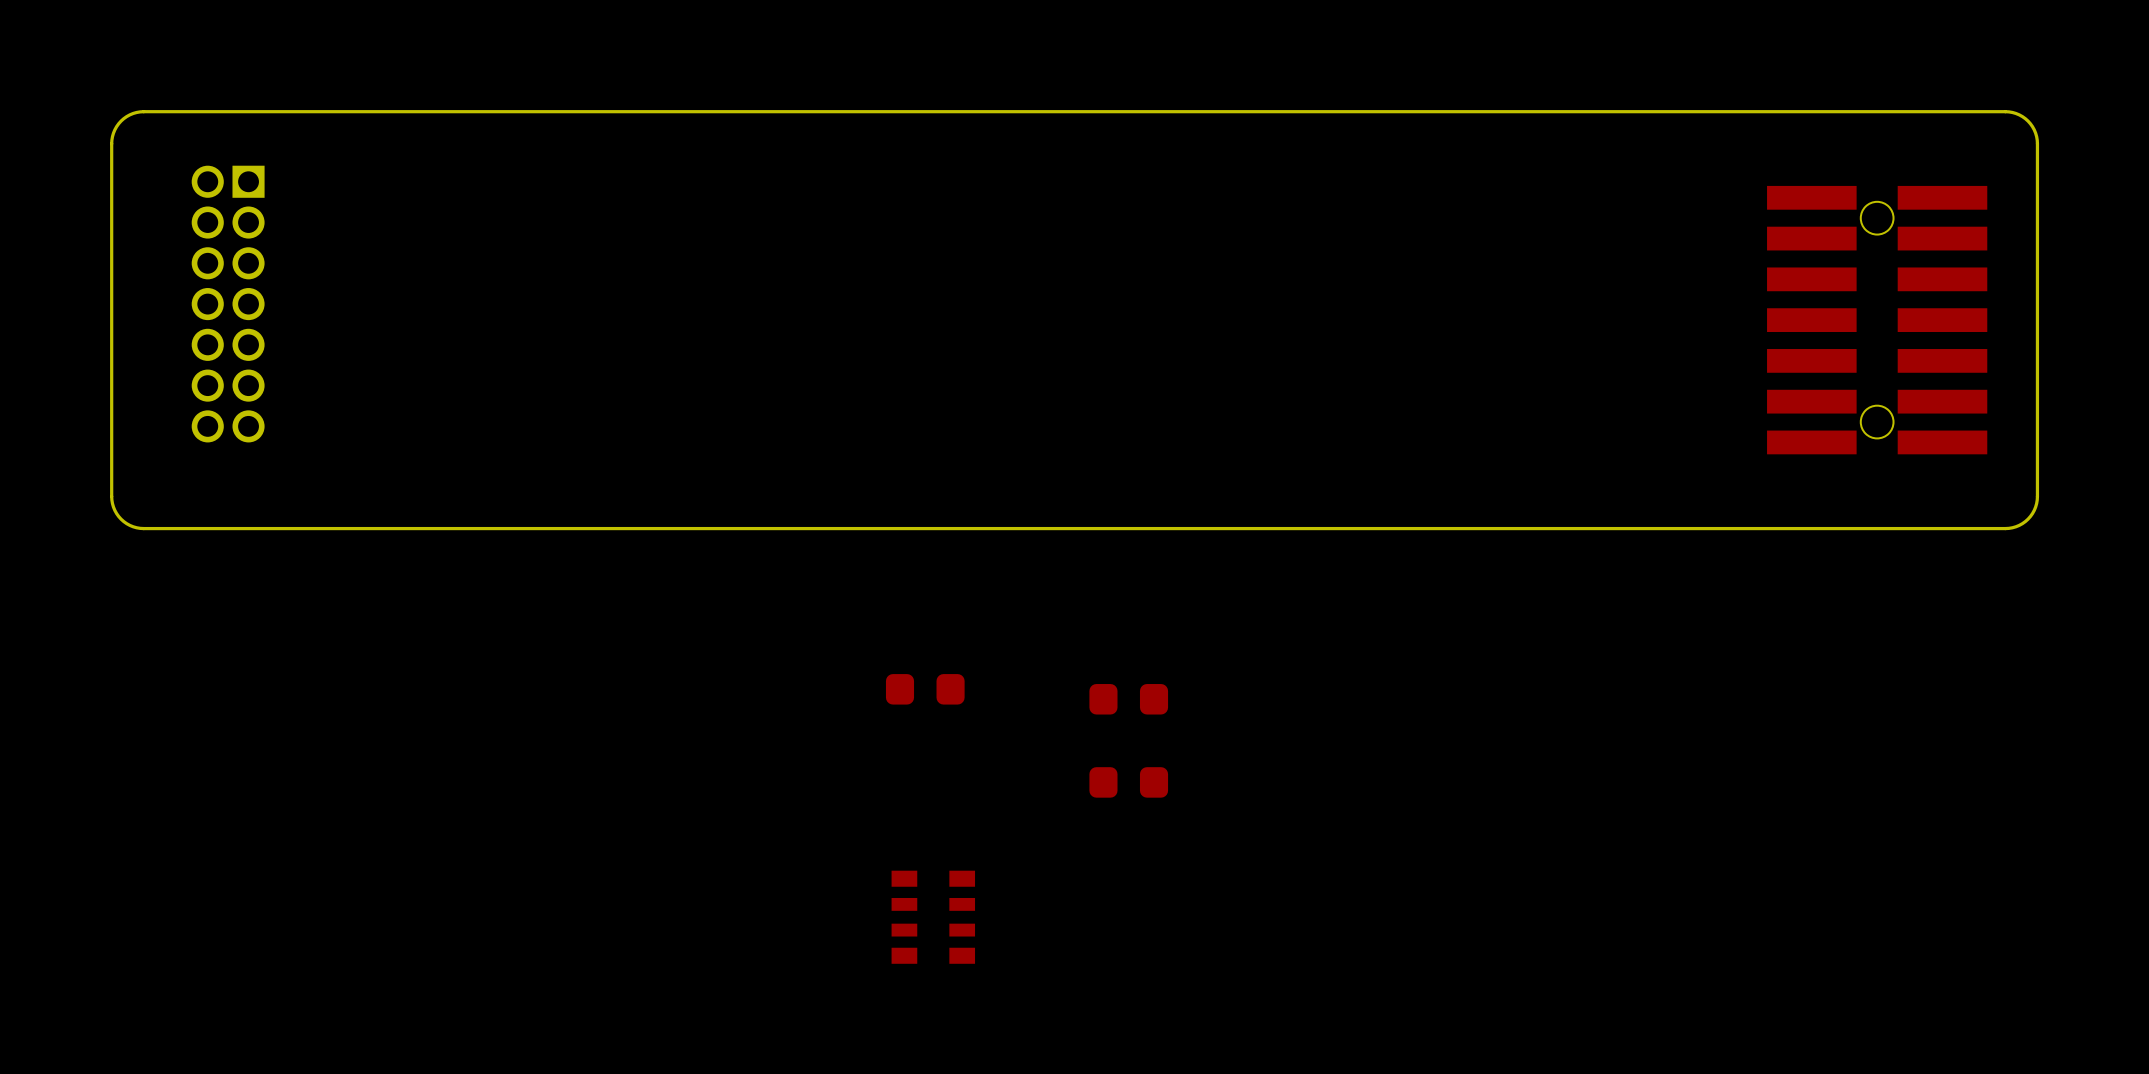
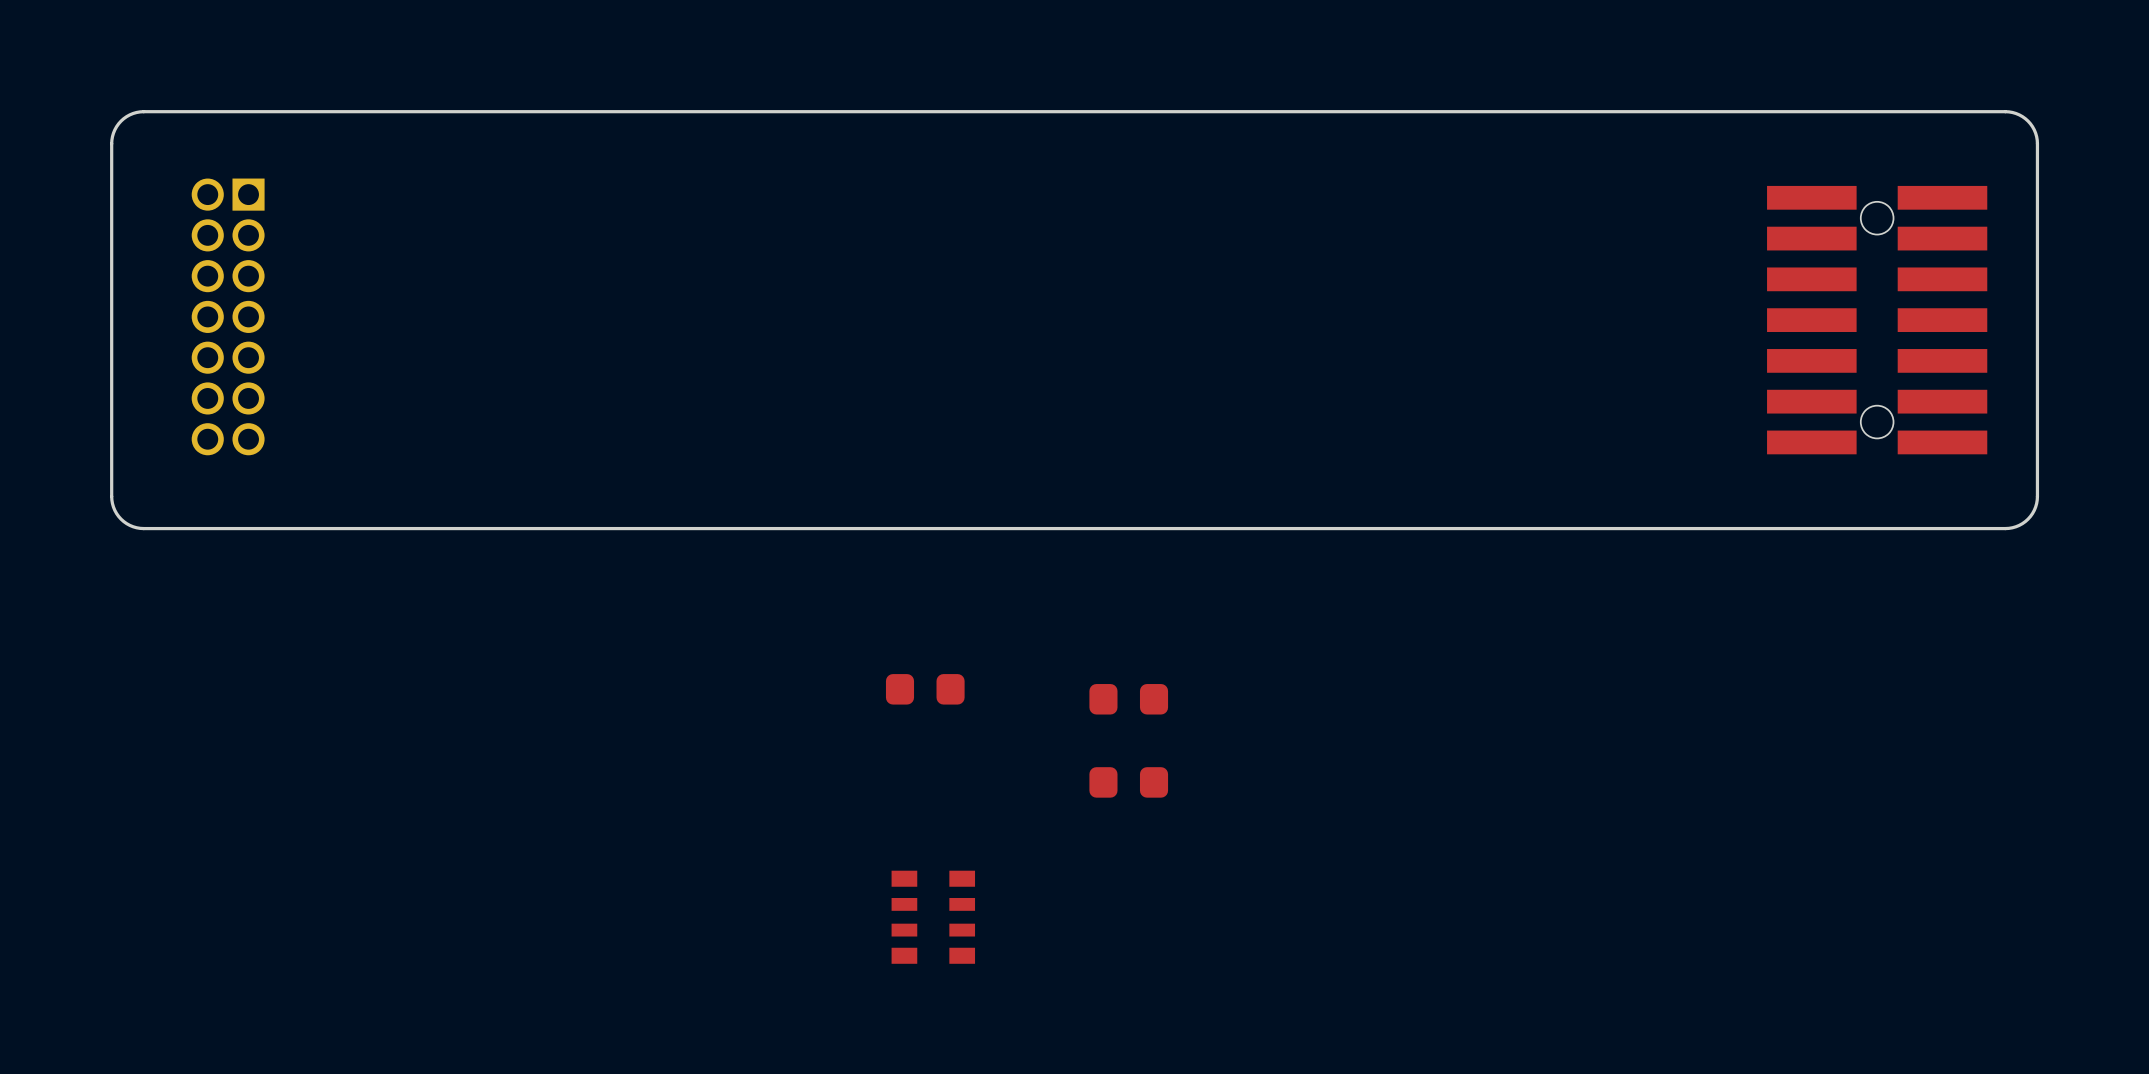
part position: (228, 304) -> (228, 316)

